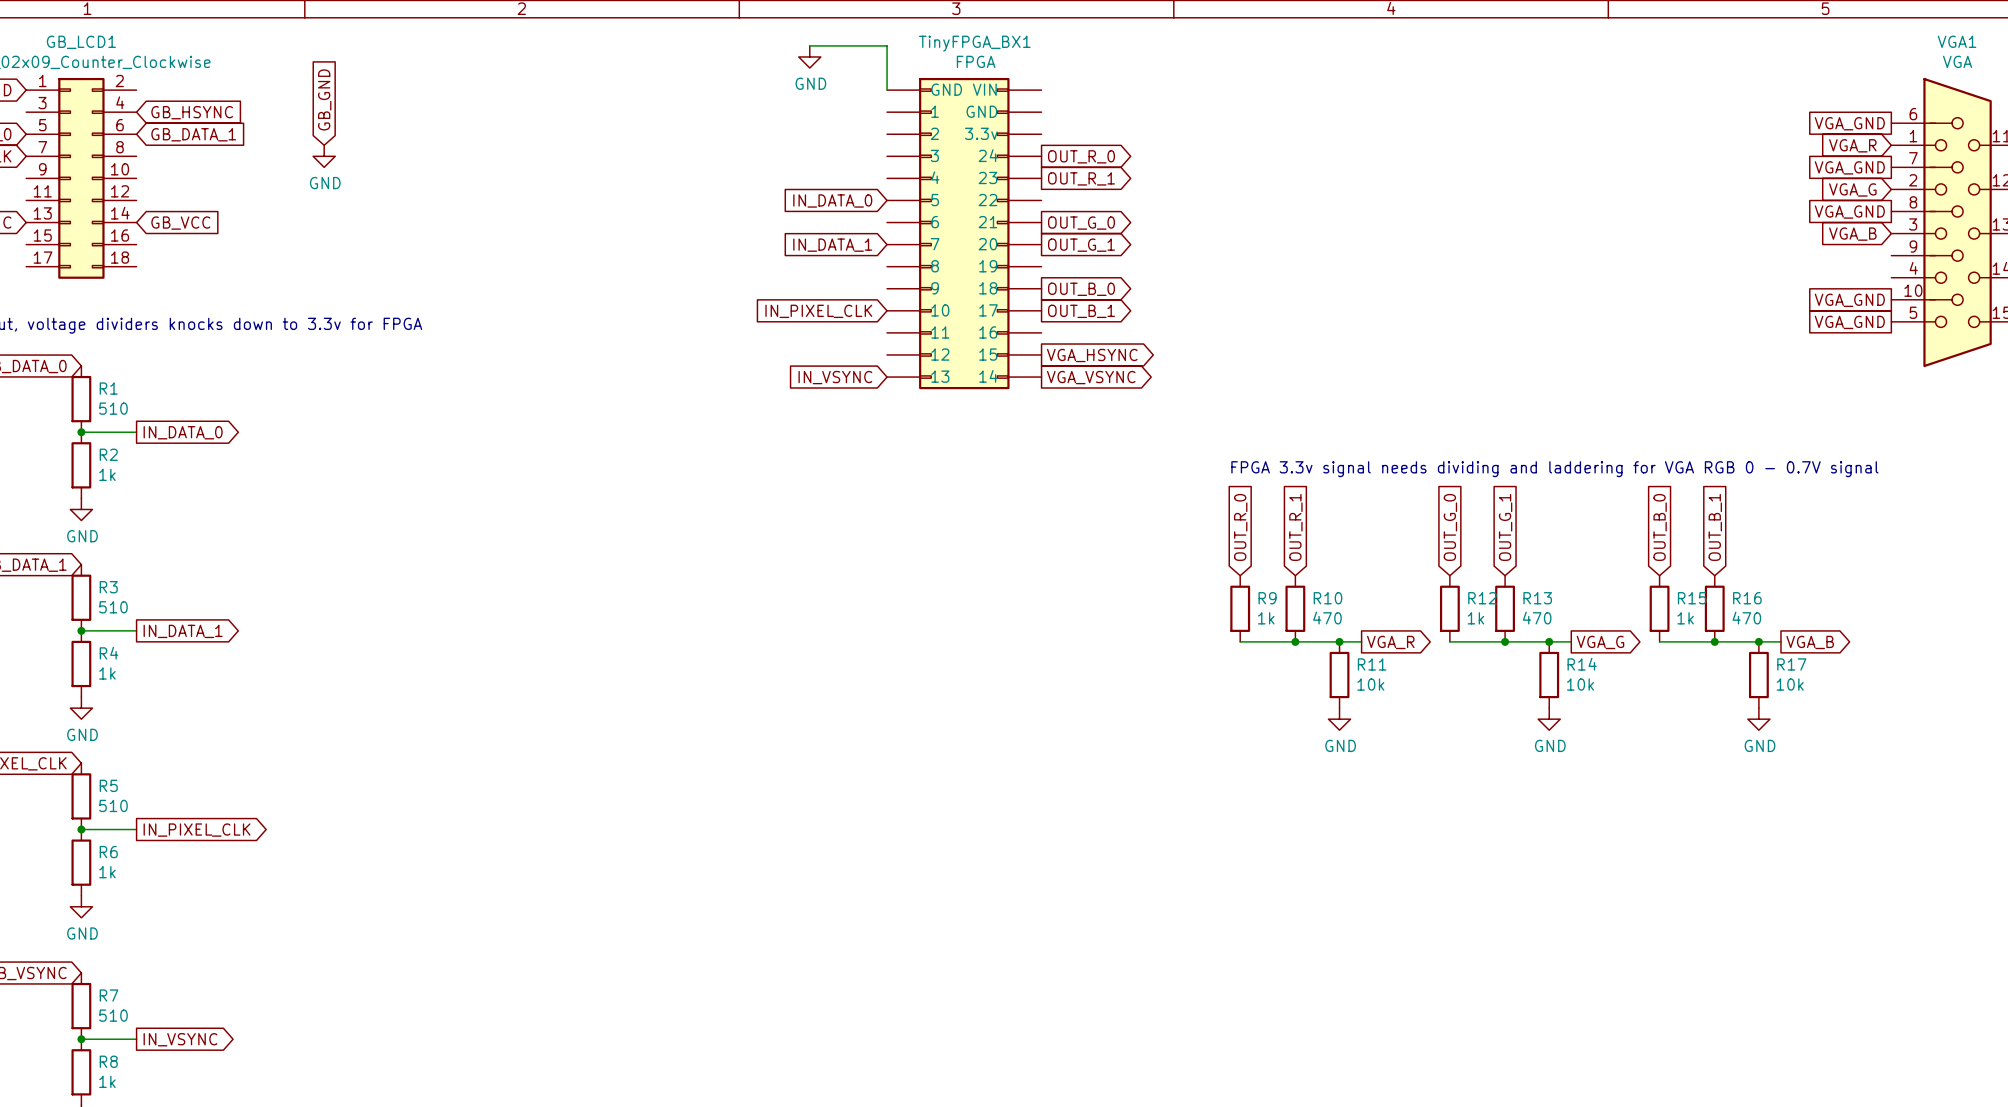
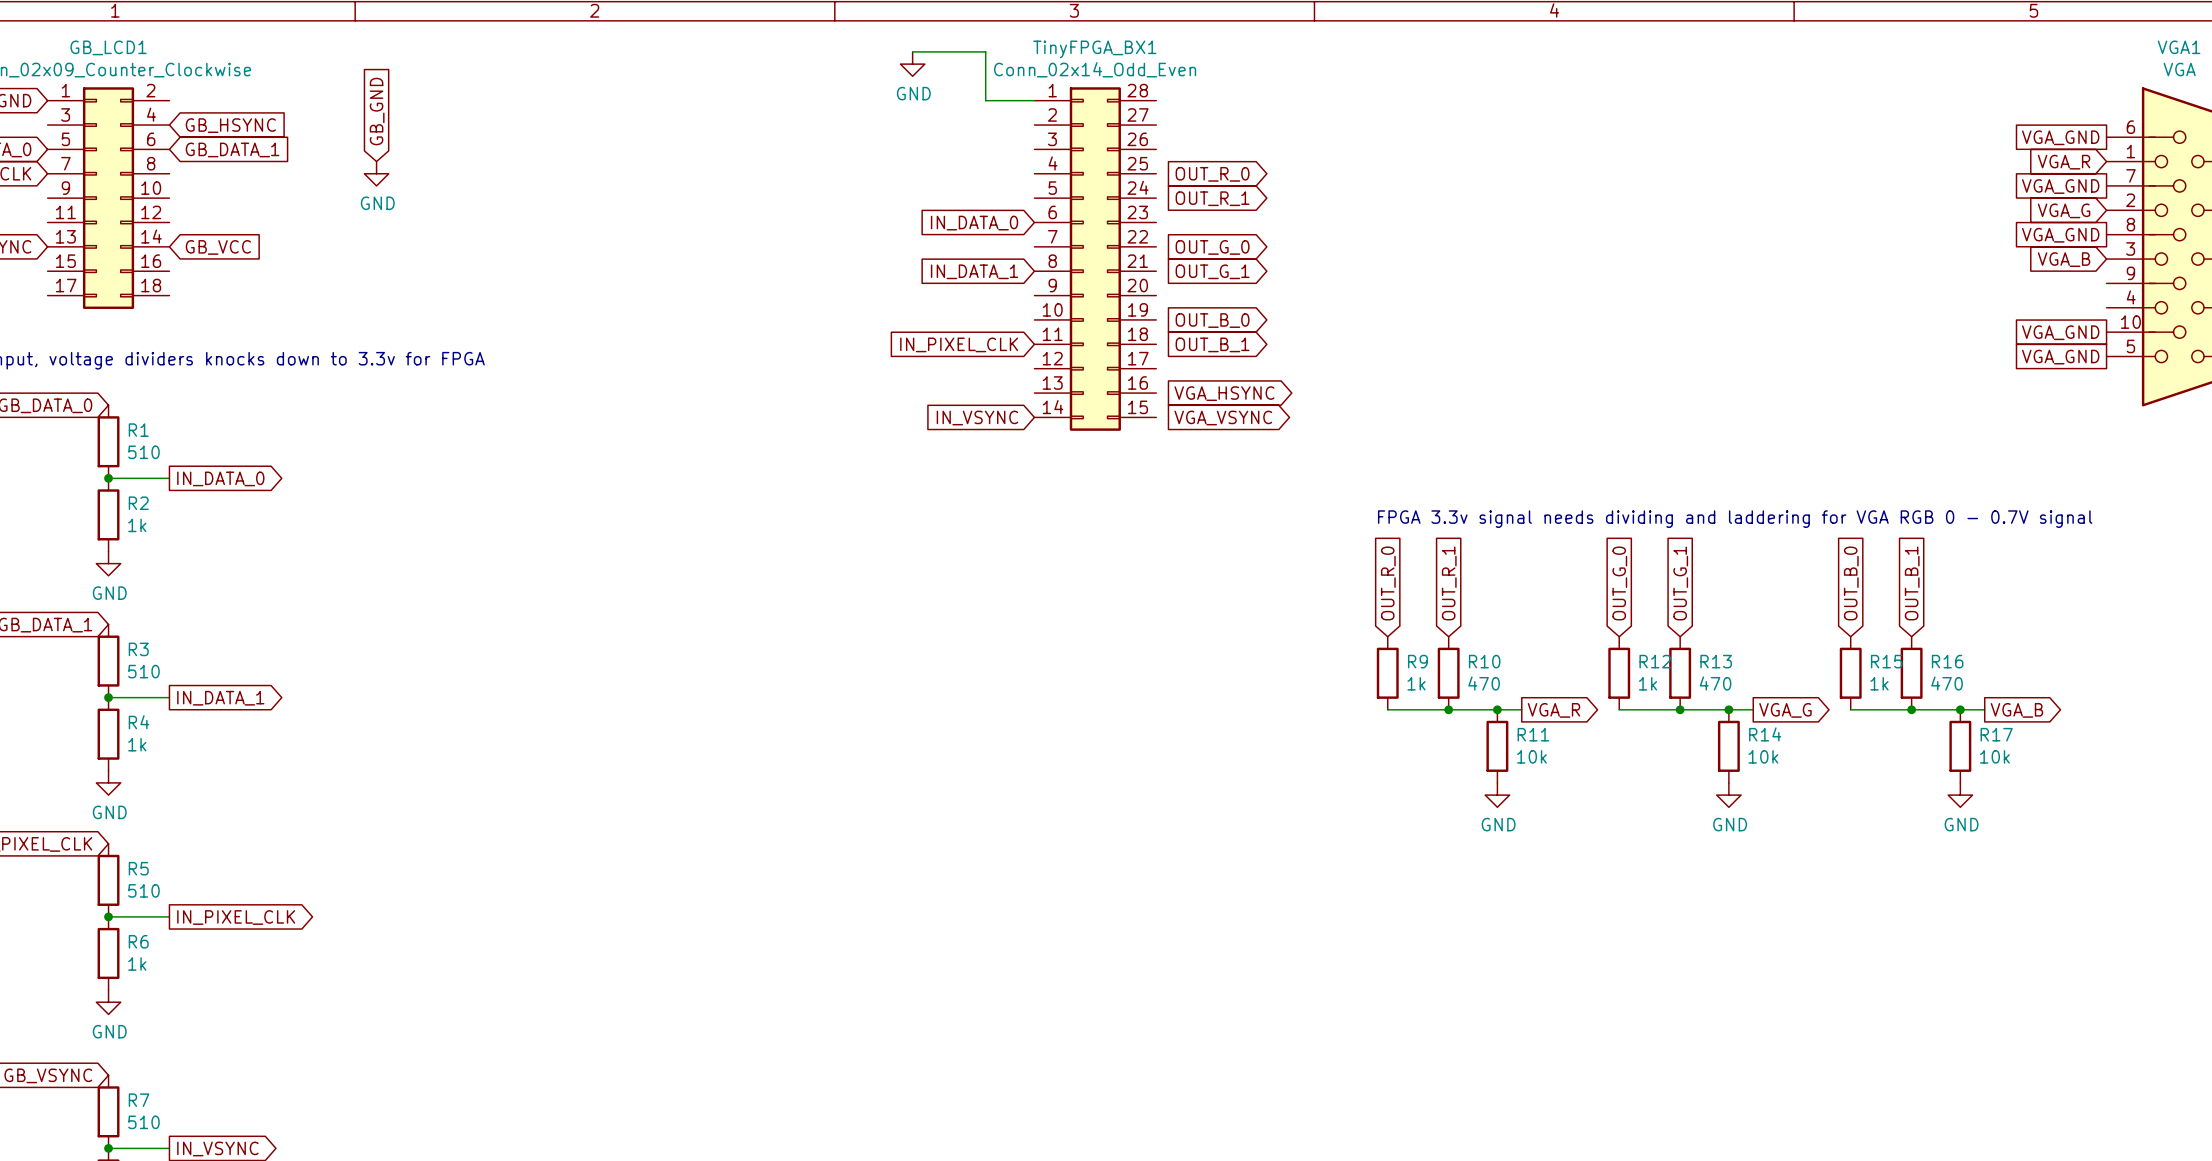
wire: (876, 45) (887, 45) (887, 90) -> (985, 51) (985, 100) (1034, 100)
TinyFPGA_BX1 value: FPGA (976, 61) -> Conn_02x14_Odd_Even (1095, 69)
TinyFPGA_BX1 symbol: [887, 77, 1042, 390] -> [1034, 87, 1157, 431]
global label position: IN_DATA_0 (832, 200) -> IN_DATA_0 (974, 223)
global label position: IN_DATA_1 (832, 245) -> IN_DATA_1 (974, 271)
global label position: IN_PIXEL_CLK (818, 311) -> IN_PIXEL_CLK (959, 344)
global label position: IN_VSYNC (835, 377) -> IN_VSYNC (977, 418)

